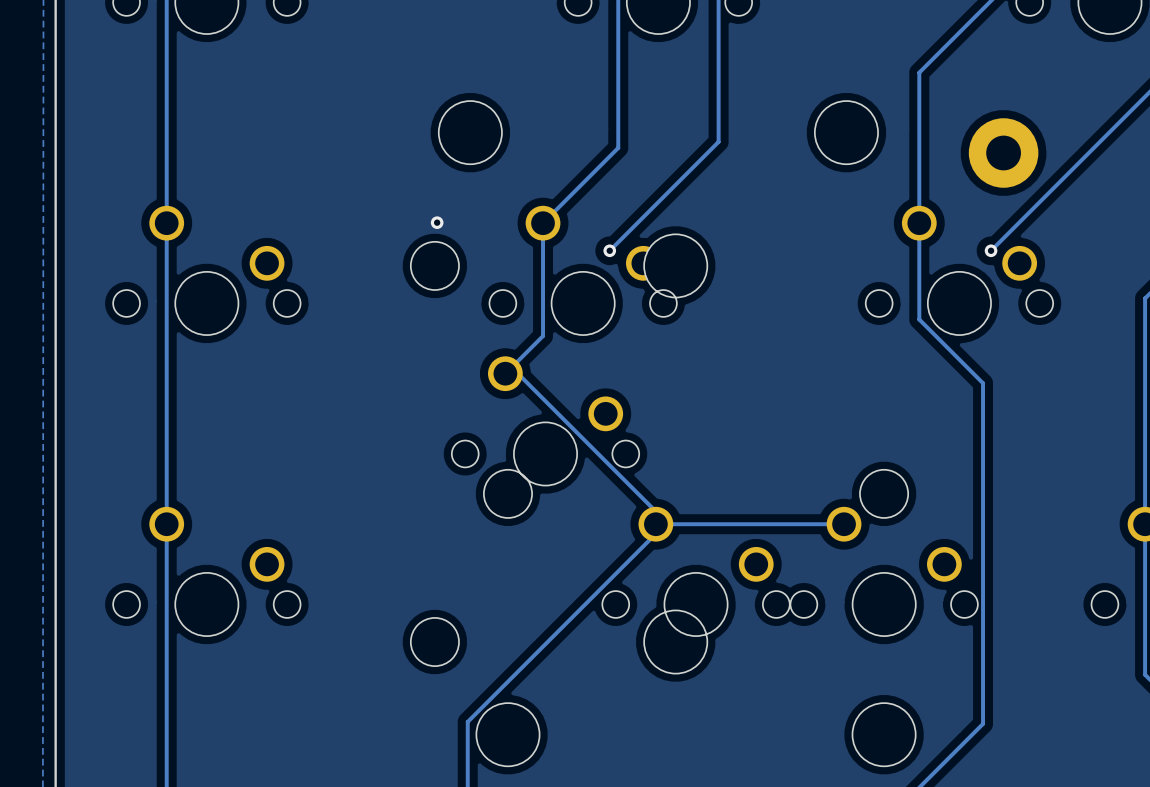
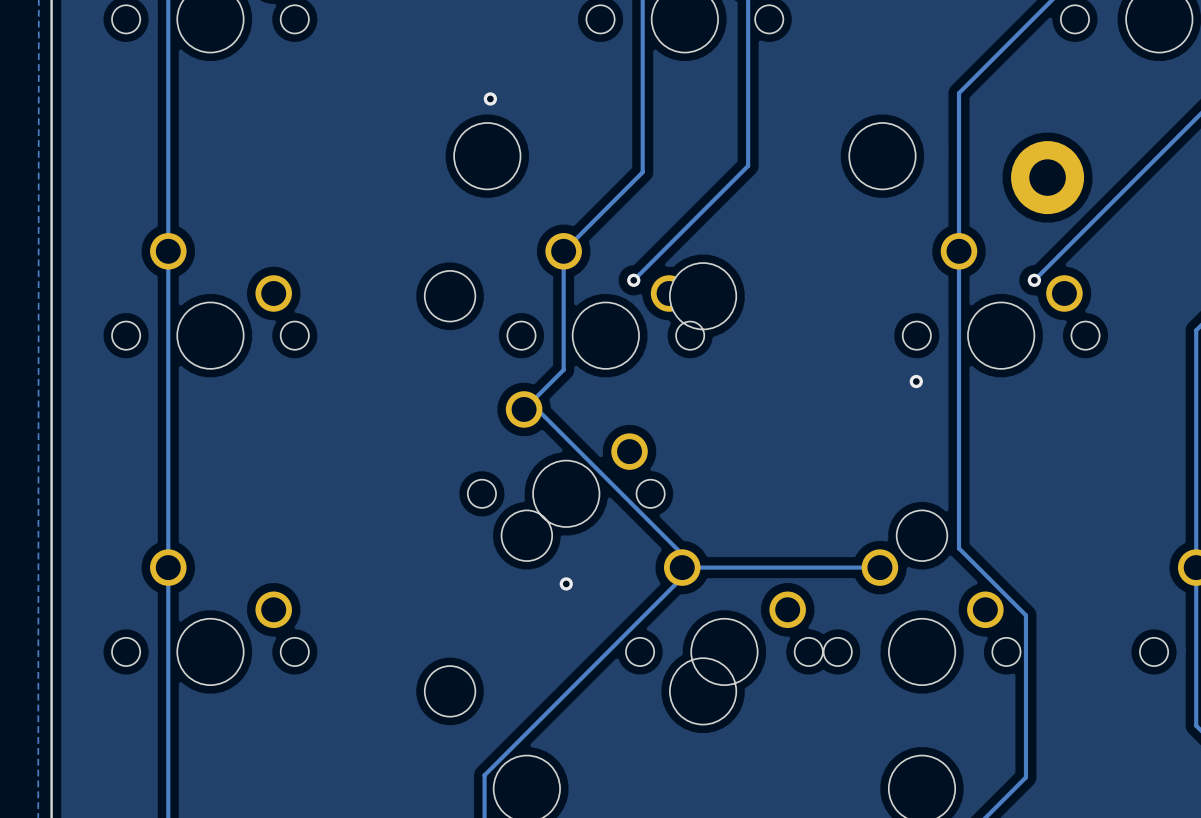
via: none -> (490, 98)
via: (437, 222) -> none
track: (919, 319) (983, 383) (983, 569) -> (959, 352) (959, 548) (1025, 615)
via: none -> (916, 381)
via: none -> (566, 583)

